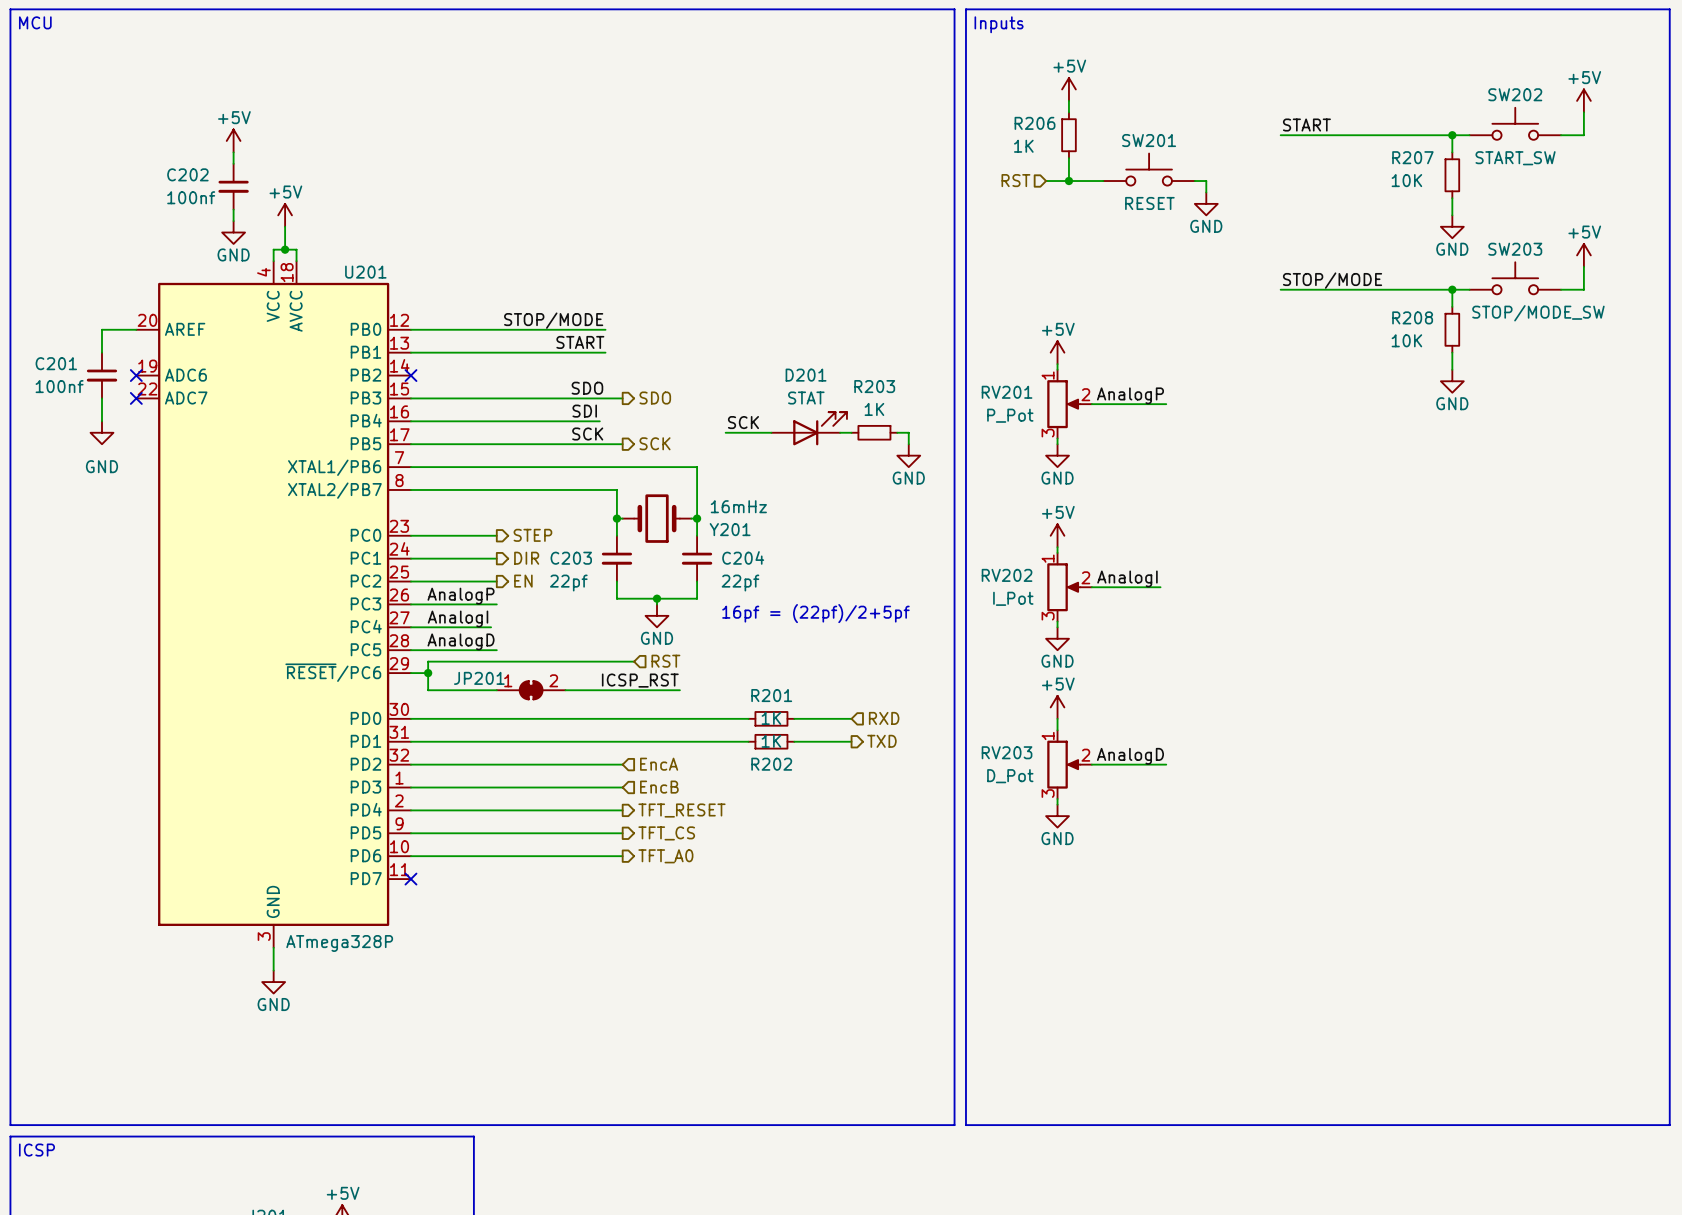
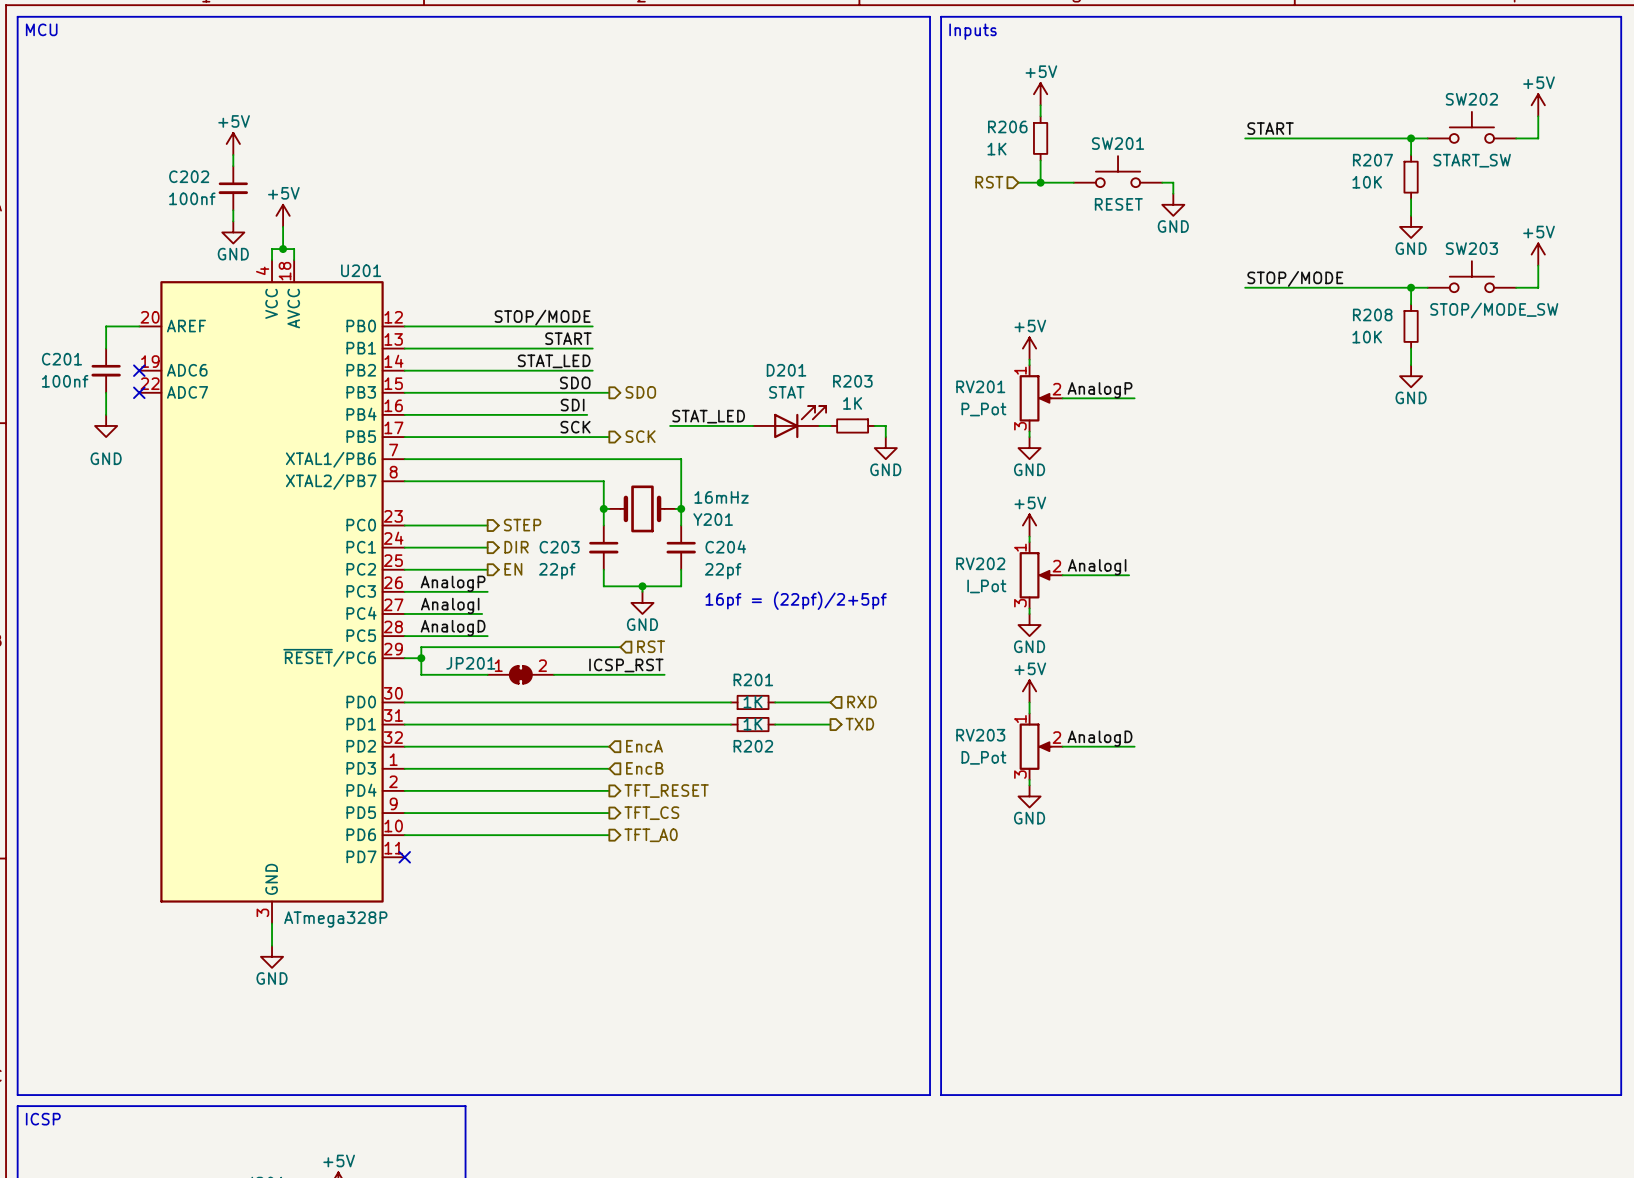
label: none -> STAT_LED (554, 361)
wire: none -> (404, 370) (592, 370)
no-connect mark: (410, 375) -> none
label: SCK (743, 422) -> none
label: none -> STAT_LED (708, 416)
wire: none -> (670, 425) (708, 425)

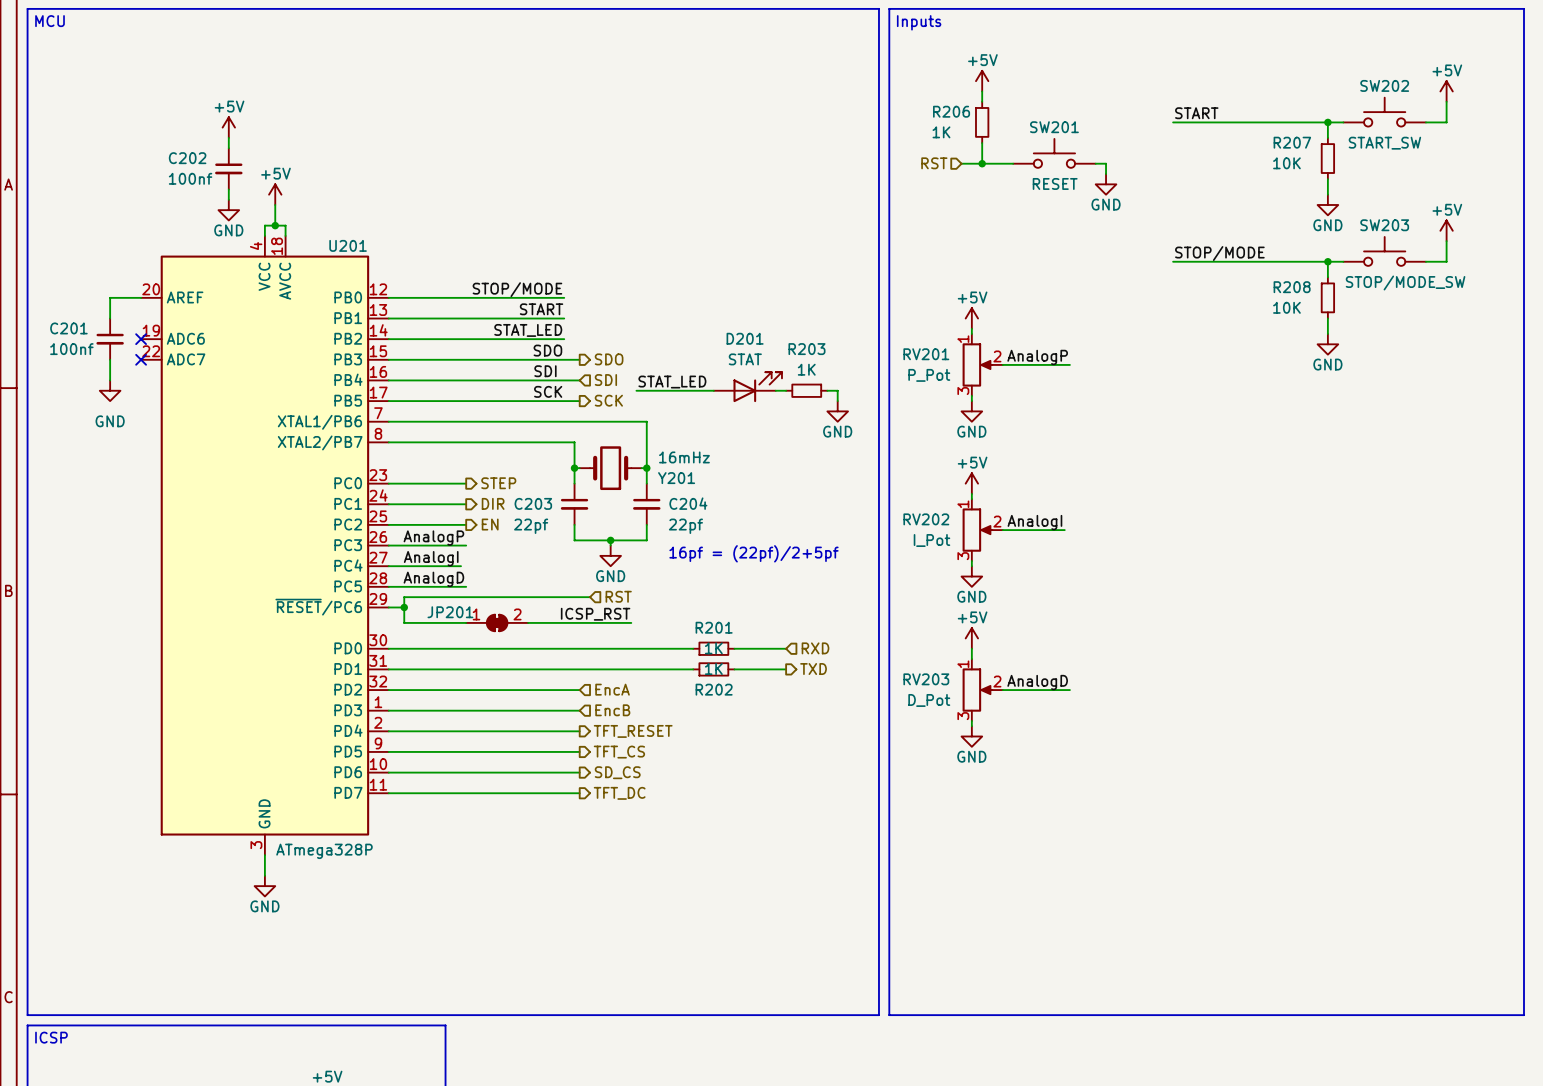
wire: none -> (559, 380) (579, 380)
hierarchical label: none -> SDI (605, 380)
hierarchical label: TFT_A0 (651, 835) -> SD_CS (617, 772)
wire: none -> (388, 793) (579, 793)
no-connect mark: (404, 857) -> none
hierarchical label: none -> TFT_DC (619, 793)

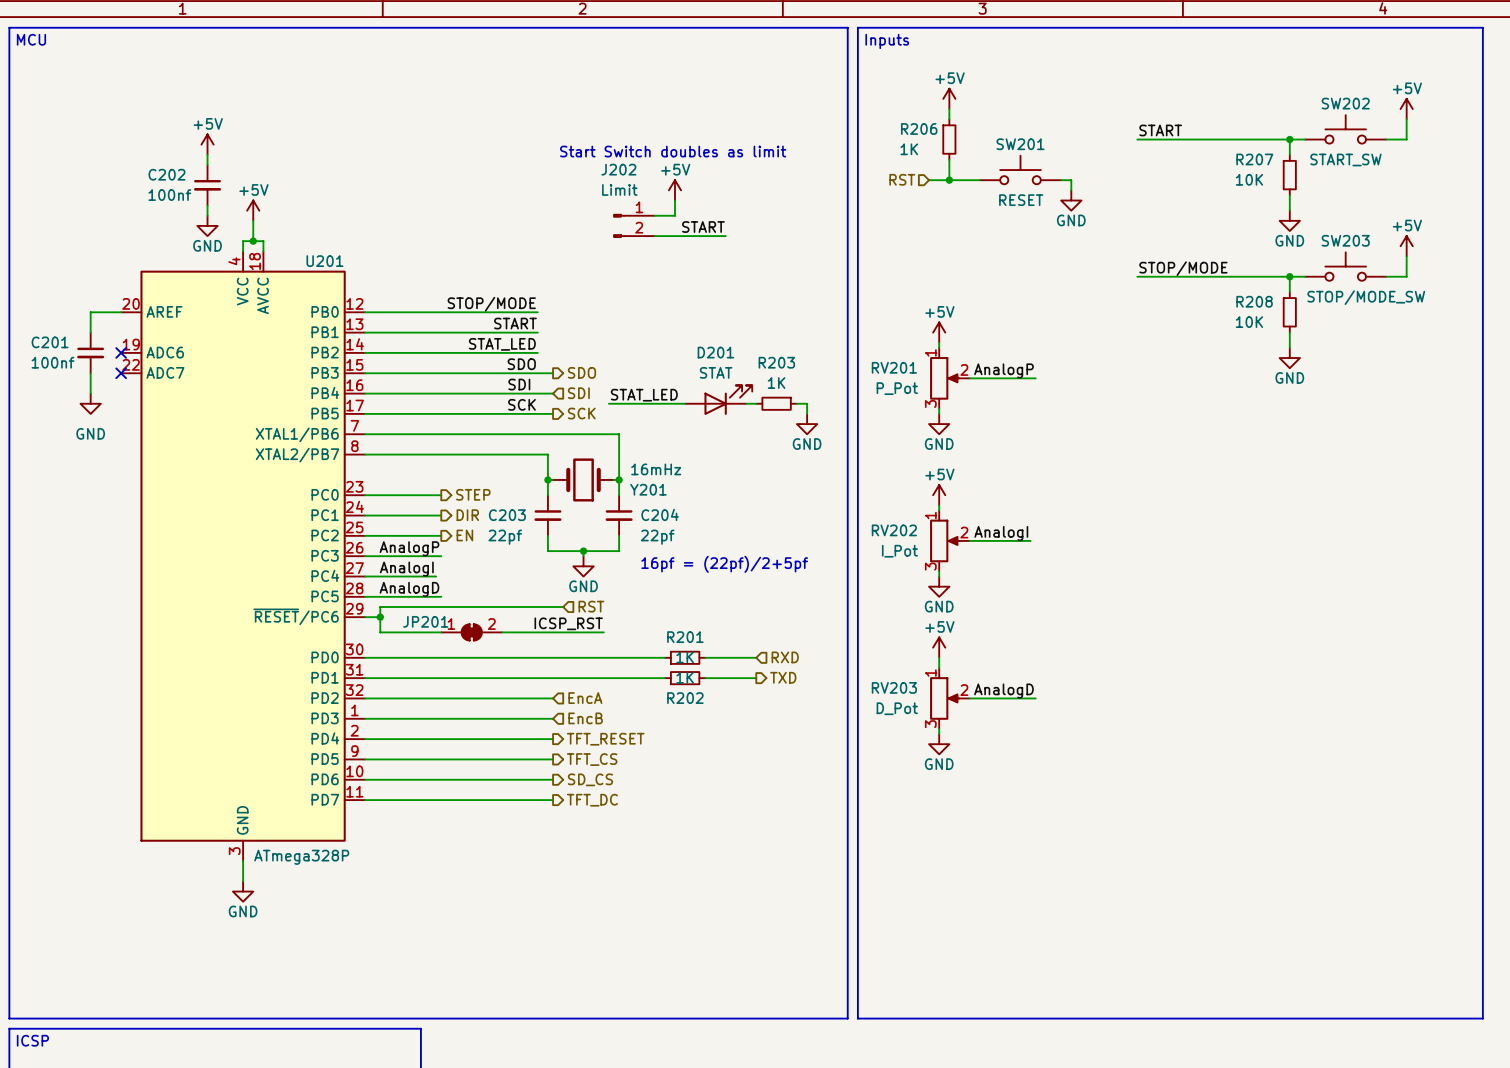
text: none -> Start Switch doubles as limit (673, 151)
power symbol: none -> +5V (674, 190)
wire: none -> (674, 200) (674, 215) (654, 215)
J202: none -> Limit (634, 225)
label: none -> START (703, 227)
wire: none -> (654, 236) (725, 236)

